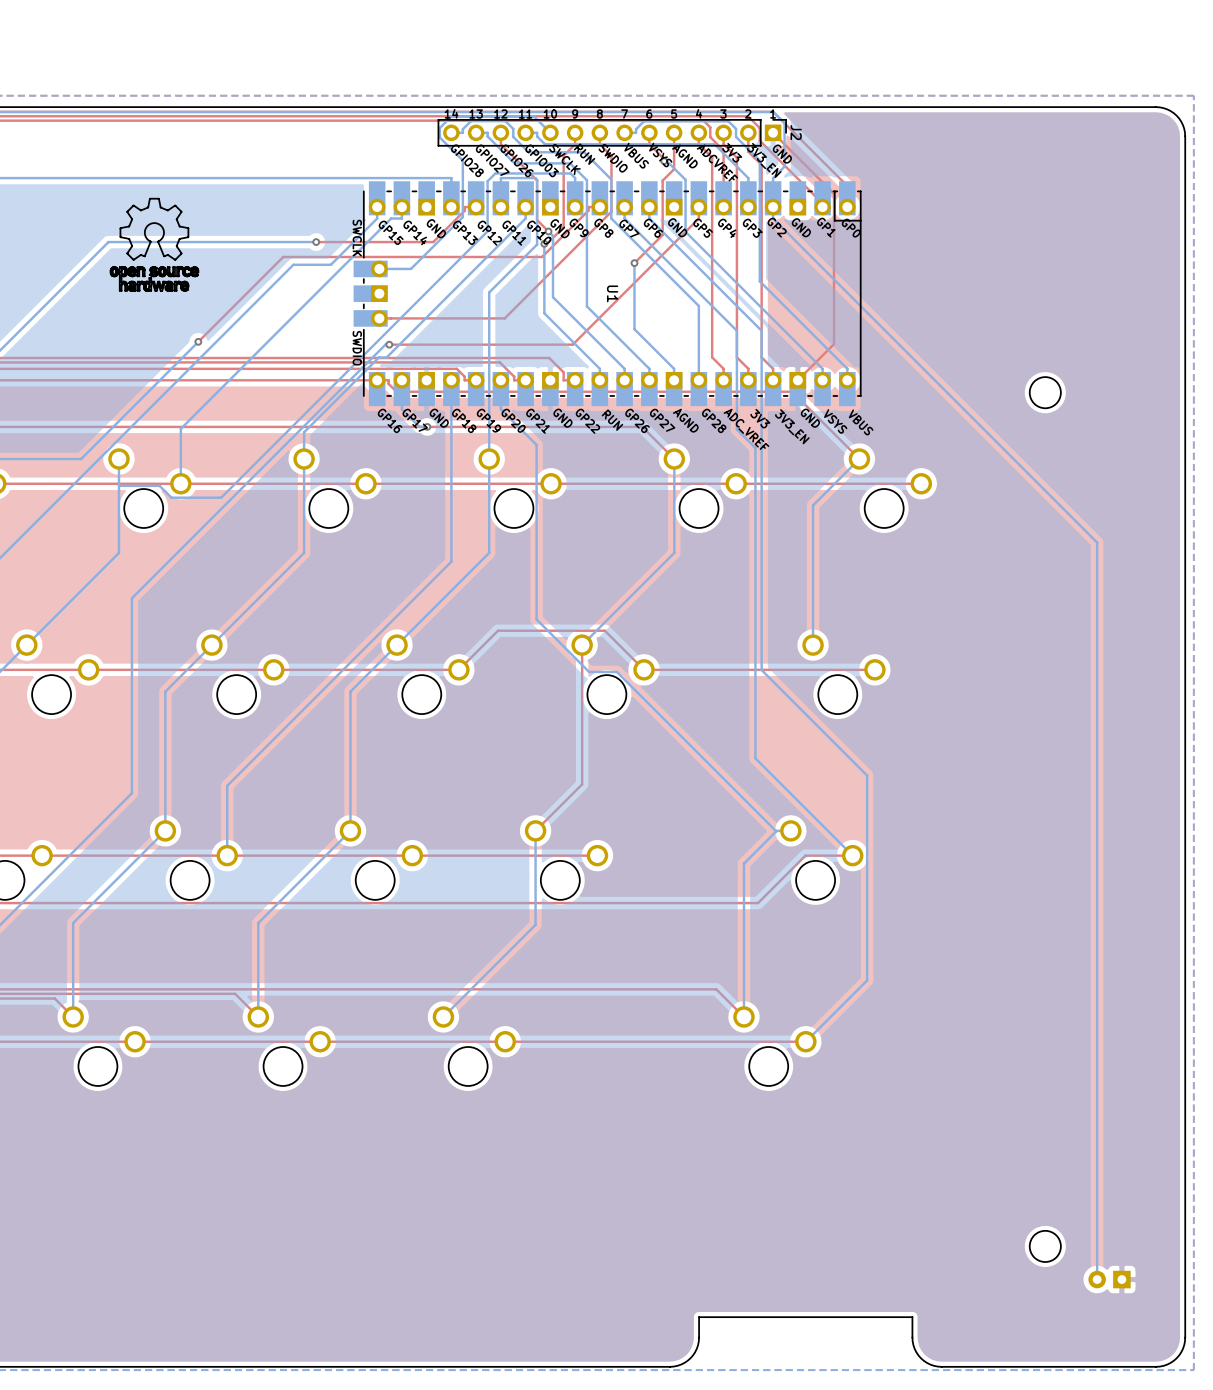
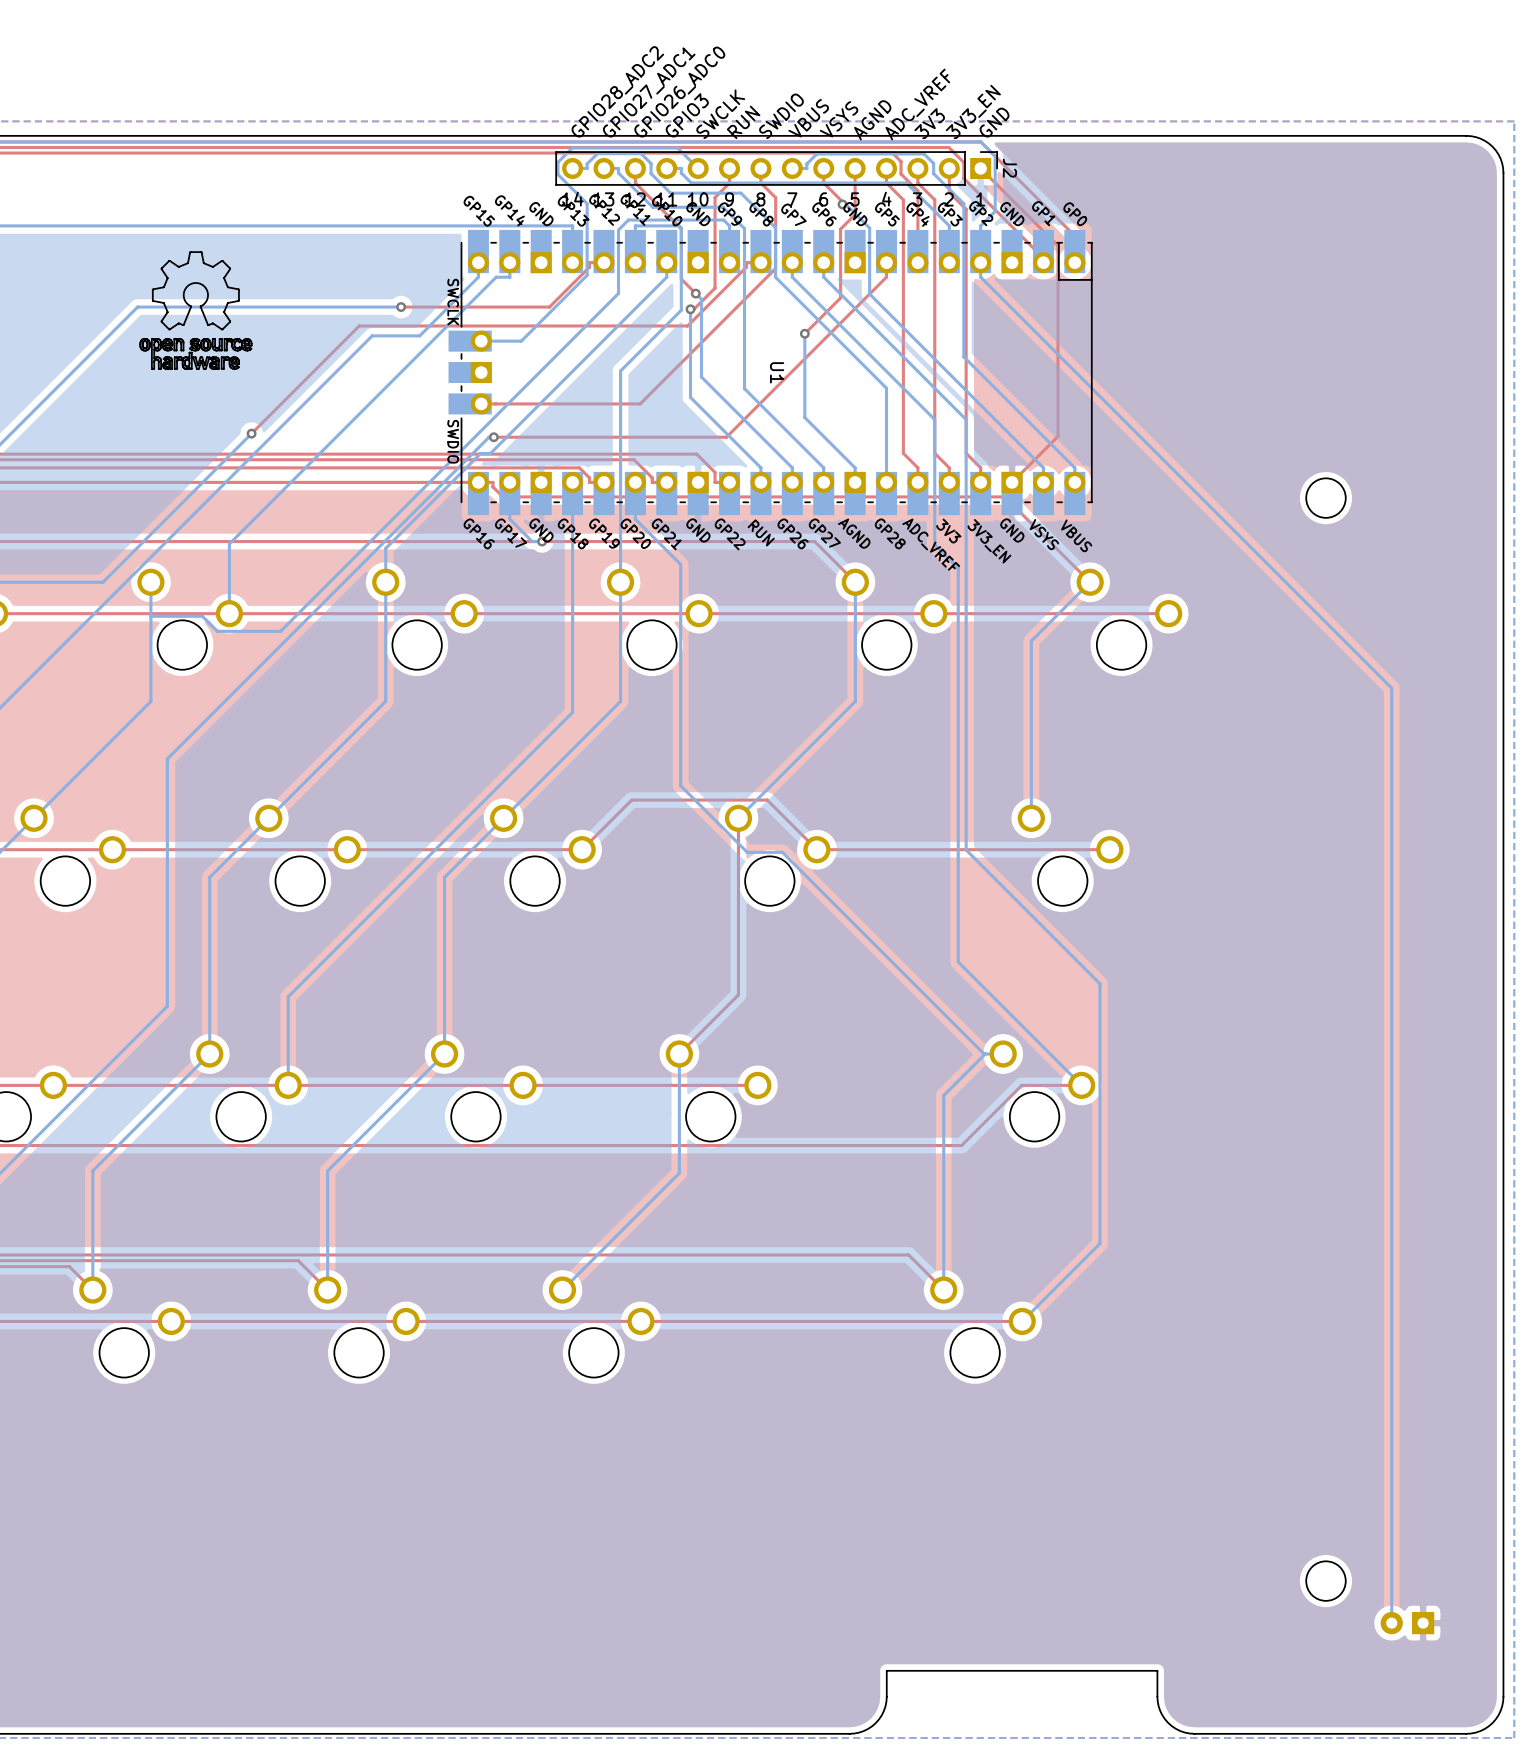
J2 footprint: [437, 119, 787, 147] -> [555, 151, 998, 186]
U1 footprint: [353, 181, 862, 407] -> [448, 229, 1093, 516]

